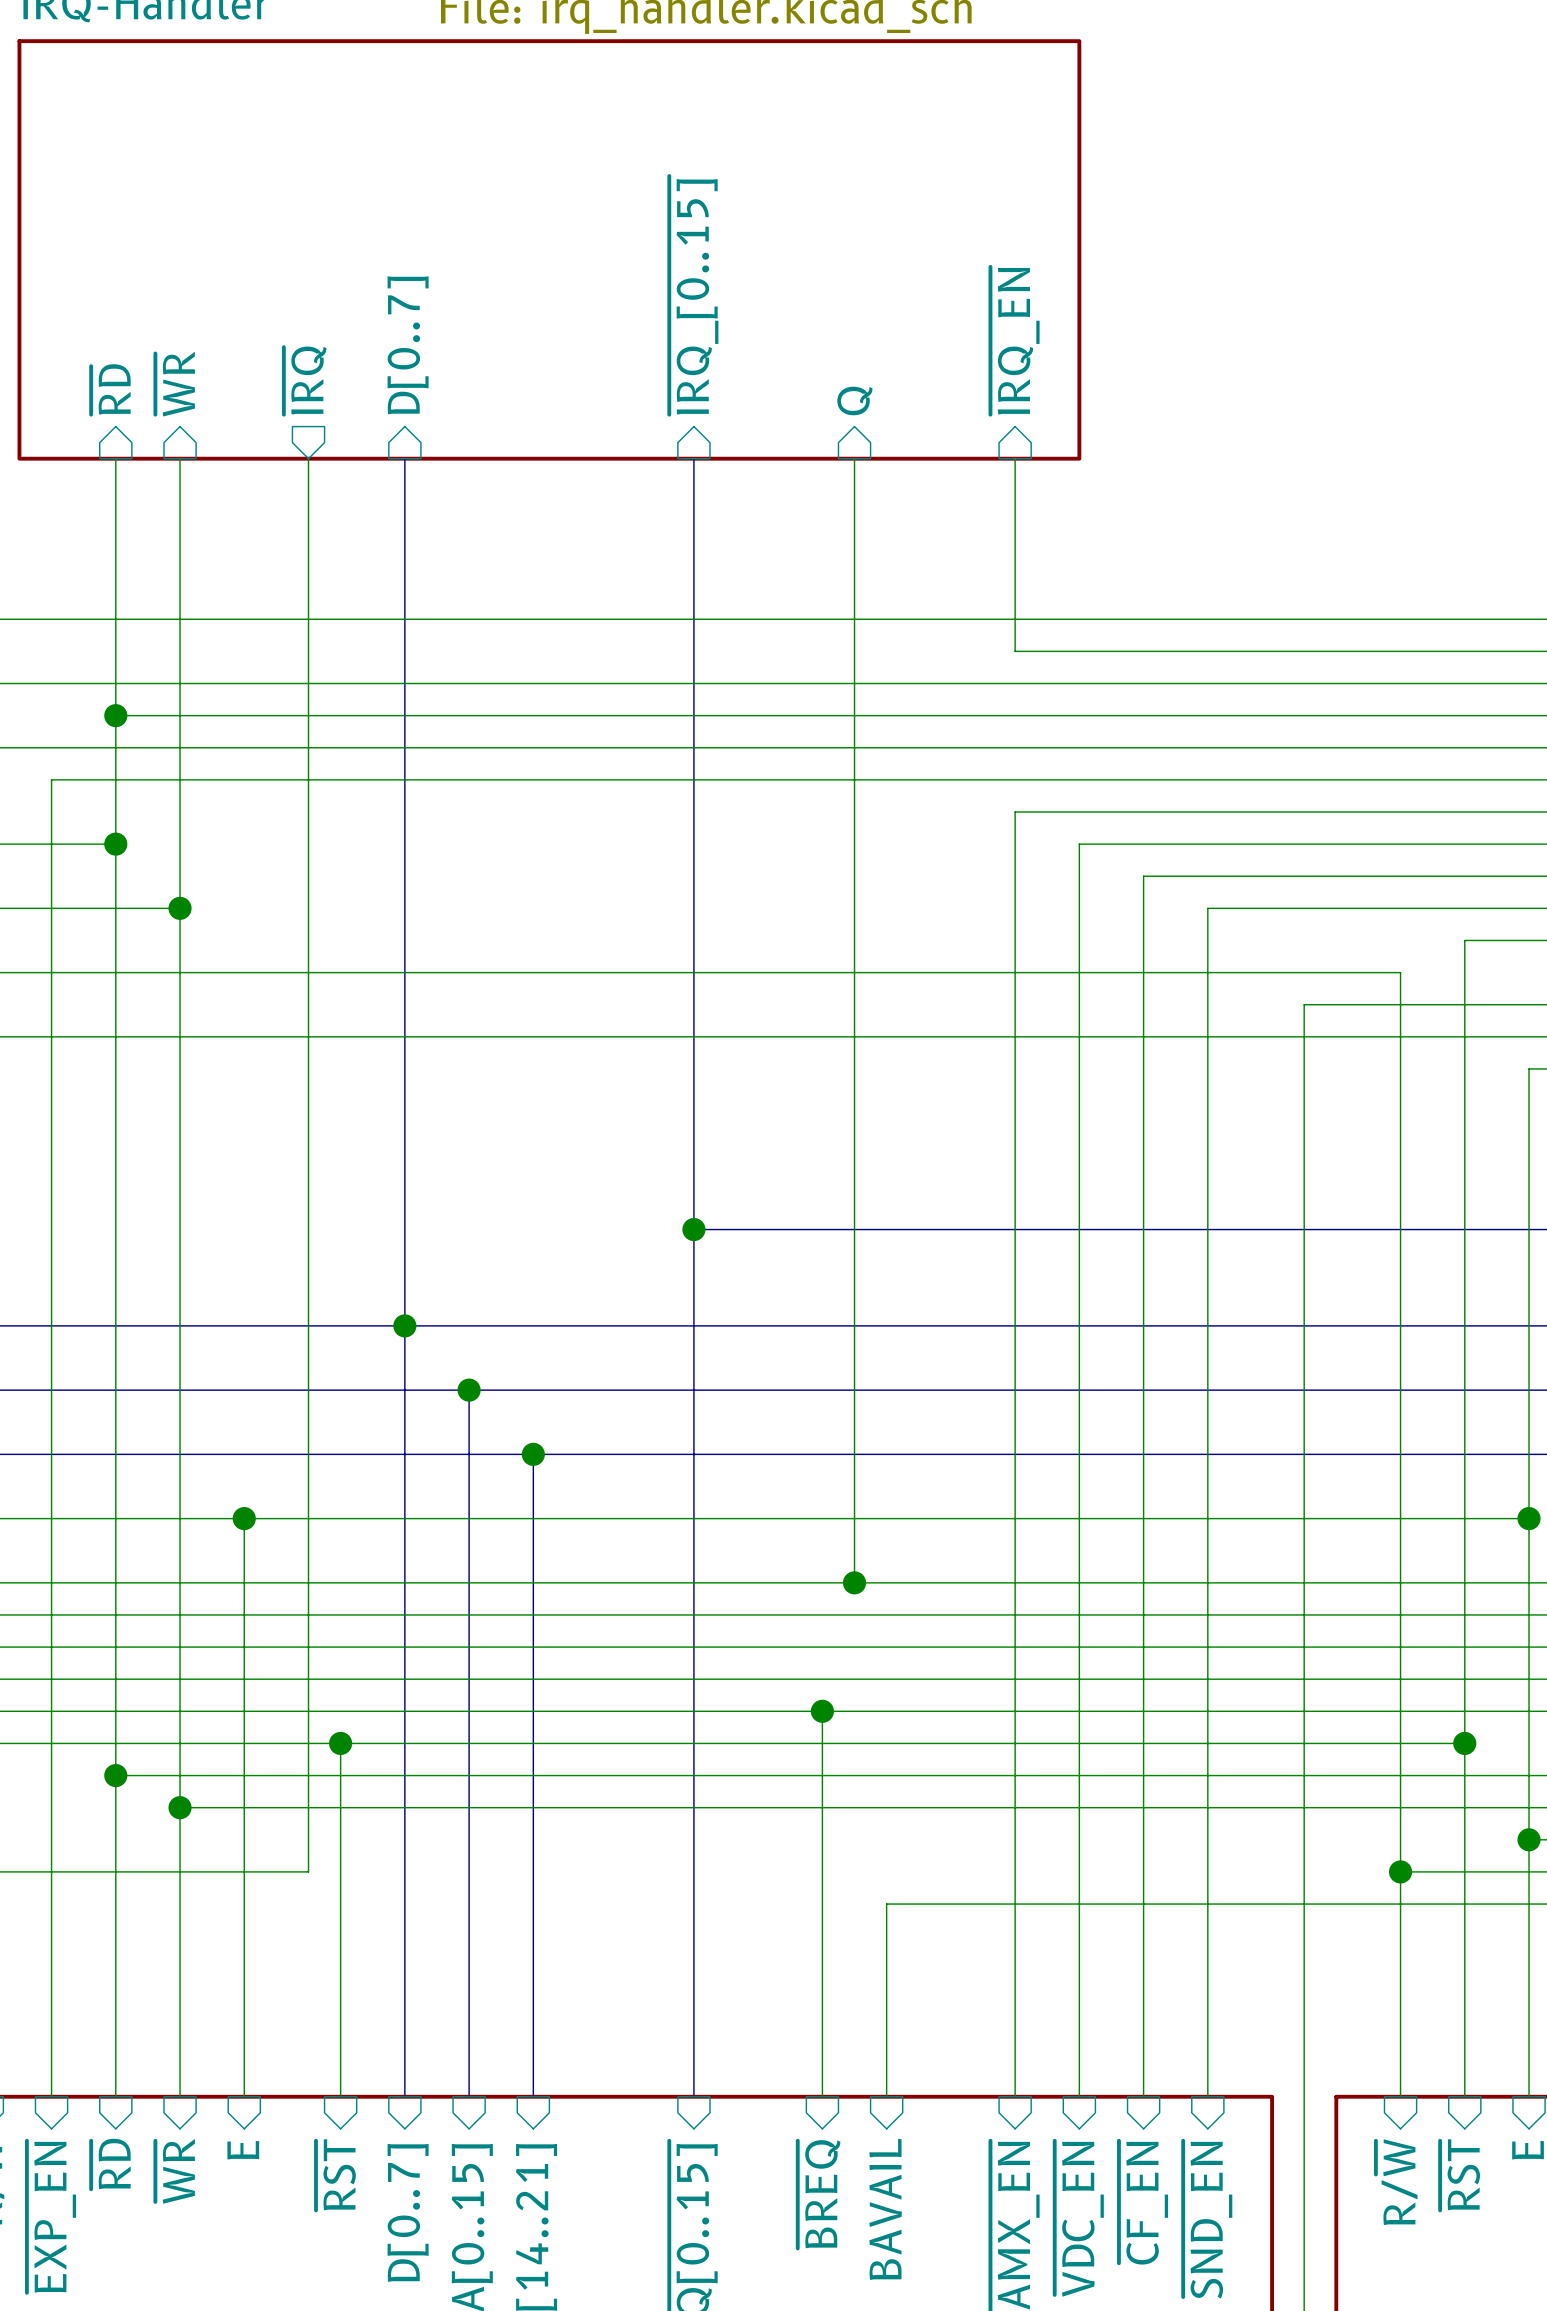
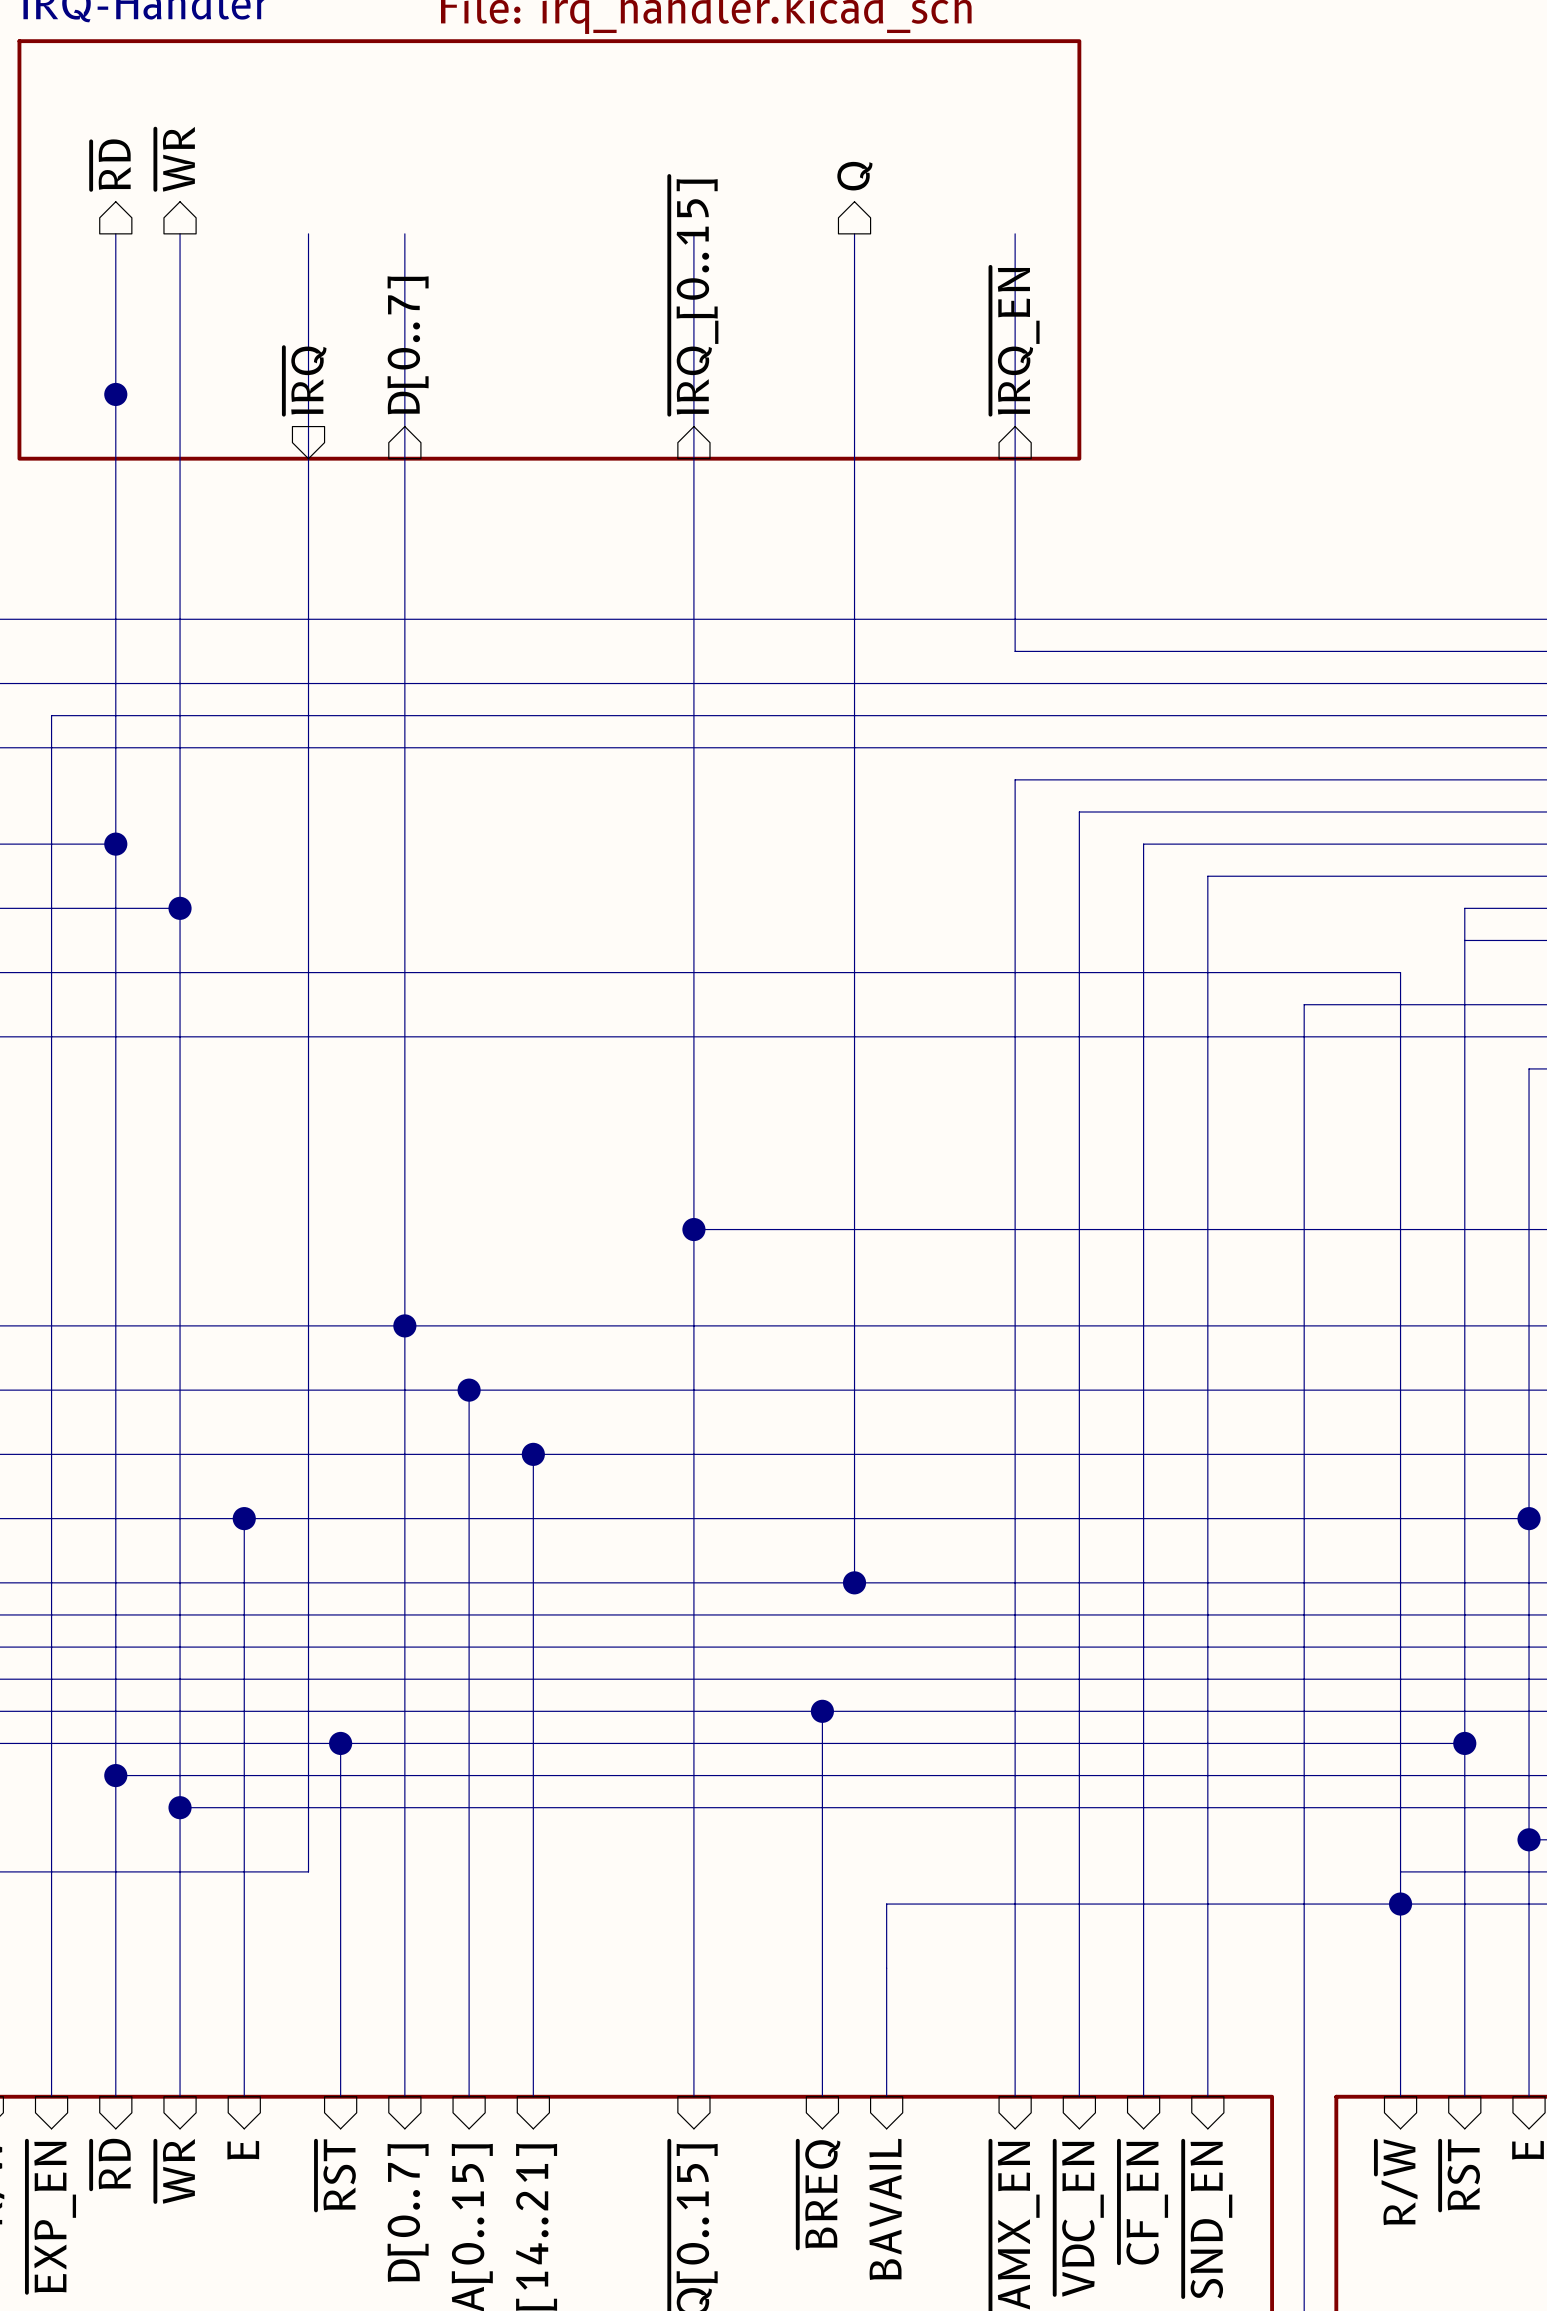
wire: none -> (115, 233) (115, 458)
wire: none -> (180, 233) (180, 458)
wire: none -> (308, 233) (308, 458)
bus: none -> (404, 233) (404, 458)
bus: none -> (693, 233) (693, 458)
wire: none -> (854, 233) (854, 458)
wire: none -> (1015, 233) (1015, 458)
sheet pin position: ~{WR} (175, 384) -> ~{WR} (175, 159)
sheet pin position: ~{RD} (110, 389) -> ~{RD} (110, 164)
junction: none -> (115, 394)
sheet pin position: Q (854, 400) -> Q (854, 176)
junction: (115, 715) -> none
wire: (51, 779) (1015, 779) -> (51, 779) (51, 715) (115, 715)
wire: (1015, 811) (1079, 811) -> (1015, 811) (1015, 779)
wire: (1079, 844) (1143, 844) -> (1079, 844) (1079, 811)
wire: none -> (1143, 844) (1143, 876)
wire: (1143, 876) (1207, 876) -> (1207, 908) (1207, 876)
wire: (1207, 908) (1464, 908) -> (1464, 940) (1464, 908)
junction position: (1400, 1871) -> (1400, 1904)

